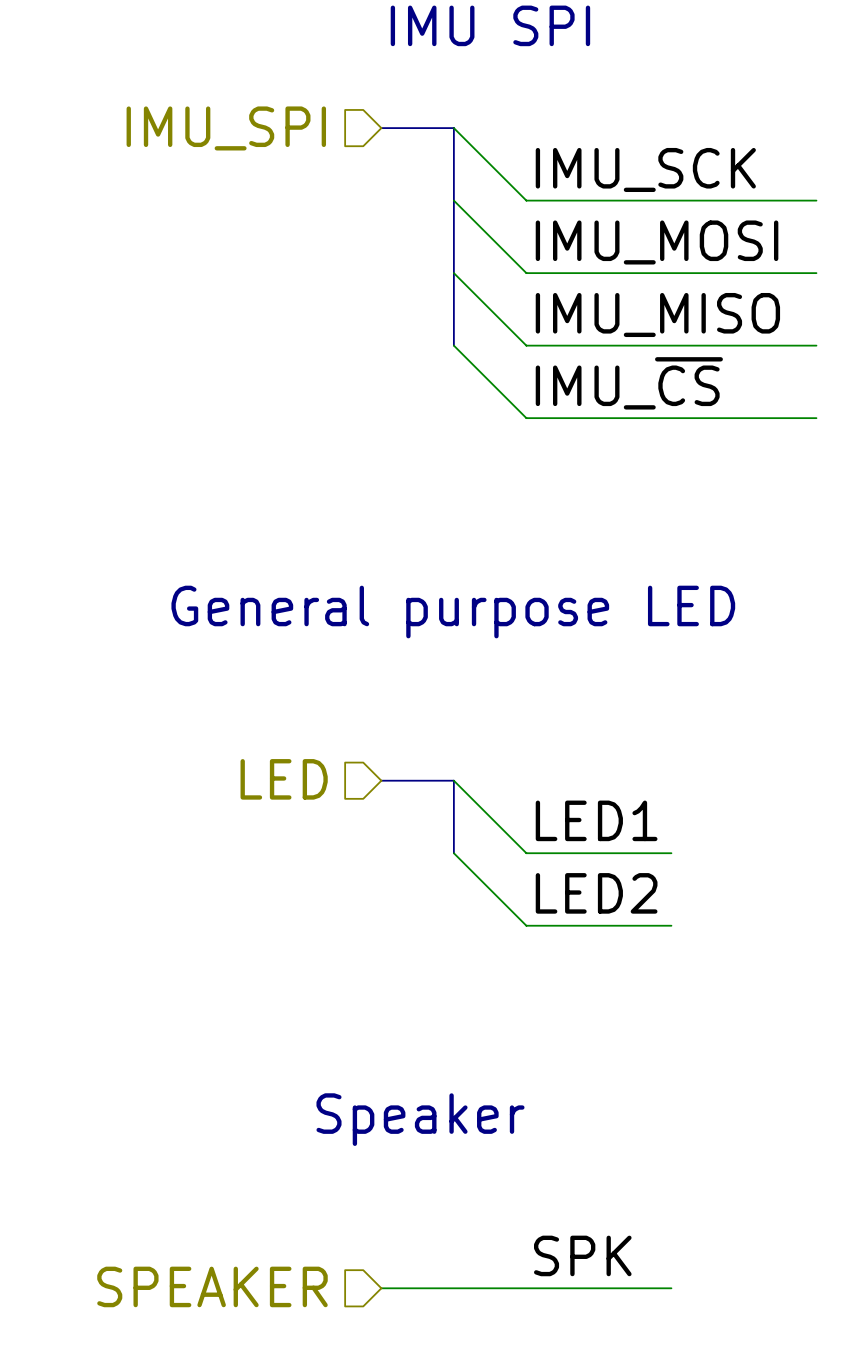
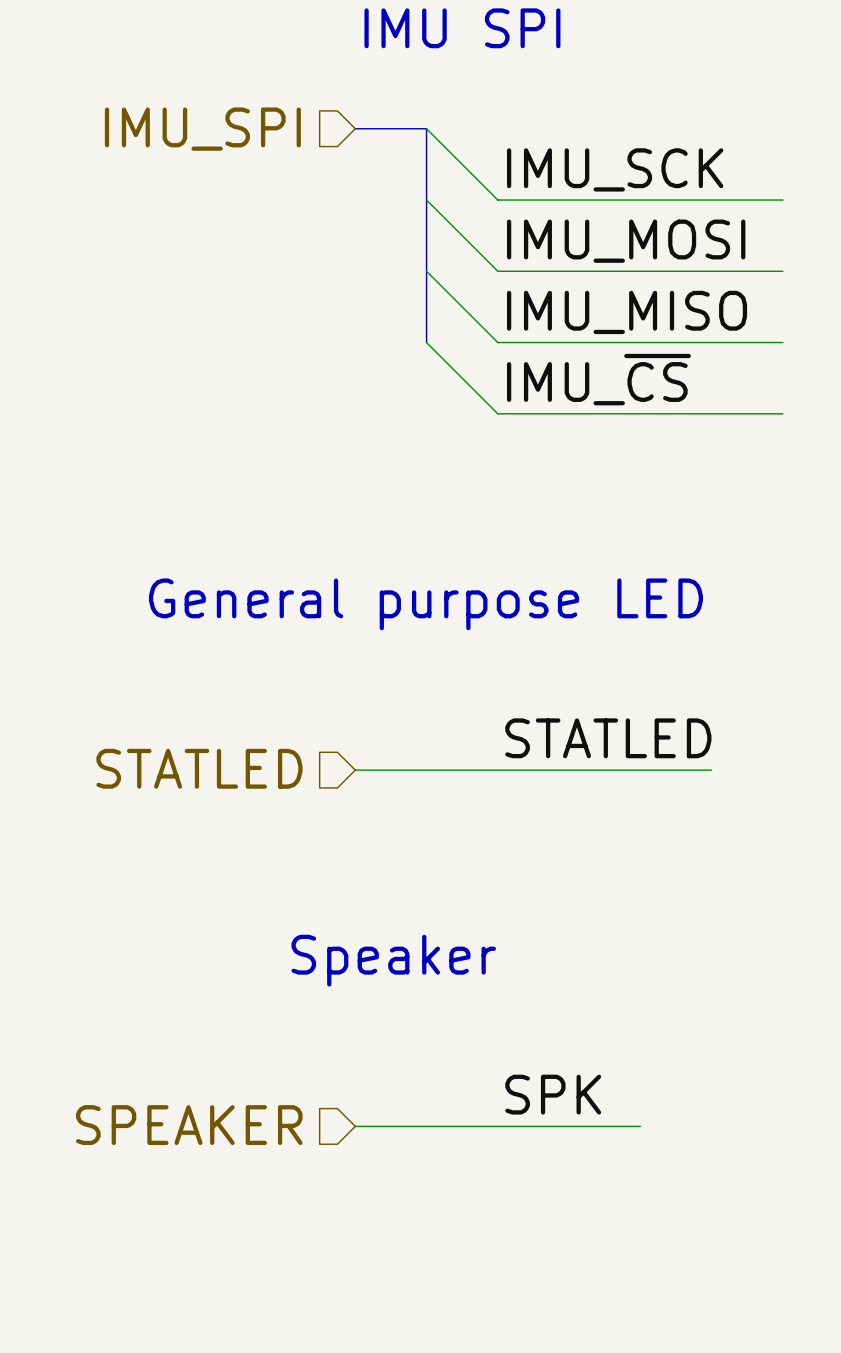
label: none -> STATLED (608, 738)
hierarchical label: LED (284, 779) -> STATLED (199, 768)
wire: none -> (355, 770) (711, 770)
bus: (381, 780) (453, 780) (453, 853) -> none
wire: (453, 780) (526, 853) (671, 853) -> none
label: LED1 (596, 820) -> none
wire: (453, 853) (526, 925) (671, 925) -> none
label: LED2 (596, 893) -> none
text position: Speaker (420, 1119) -> Speaker (393, 960)
label position: SPK (582, 1255) -> SPK (553, 1094)
hierarchical label position: SPEAKER (212, 1286) -> SPEAKER (189, 1125)
wire: (381, 1288) (671, 1288) -> (355, 1126) (640, 1126)

